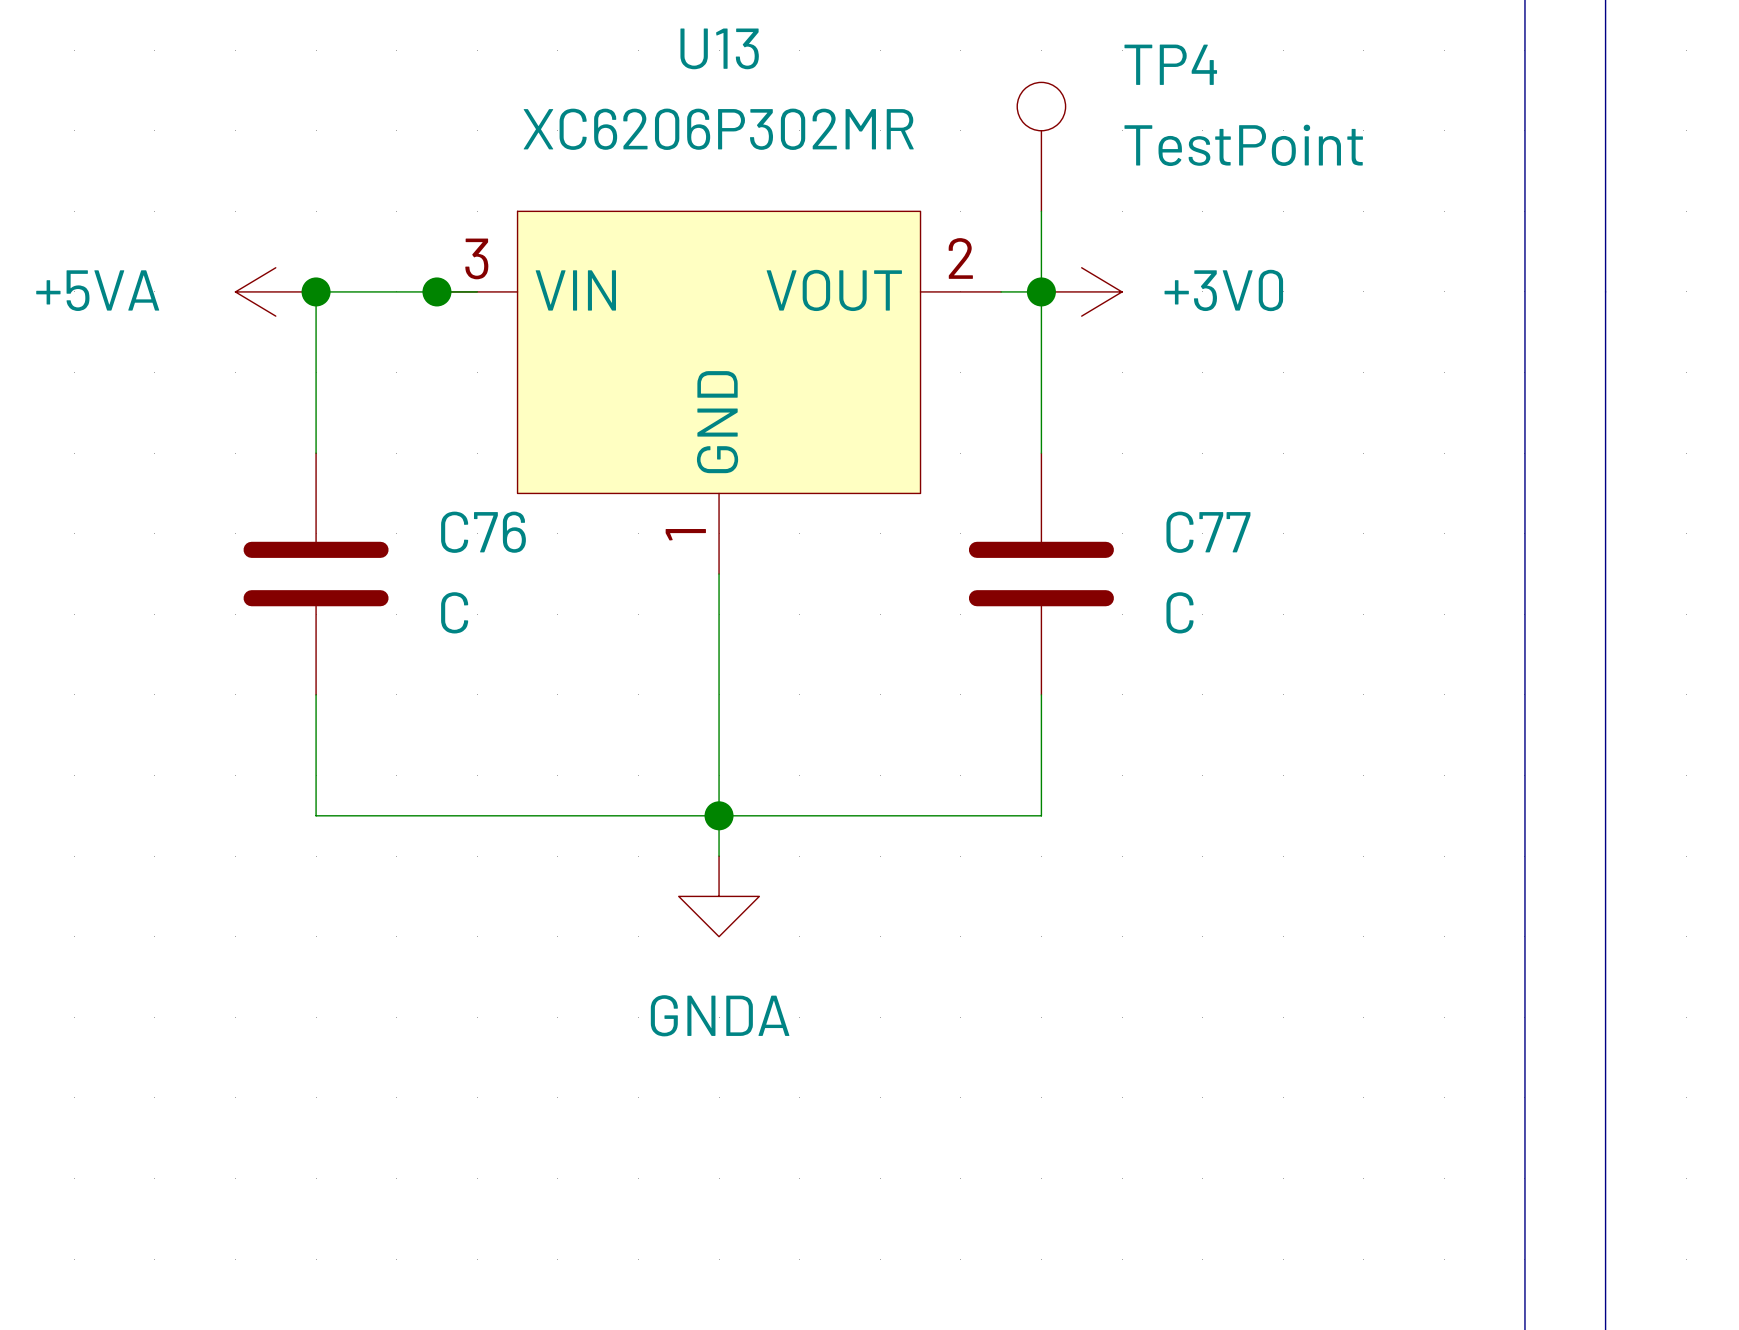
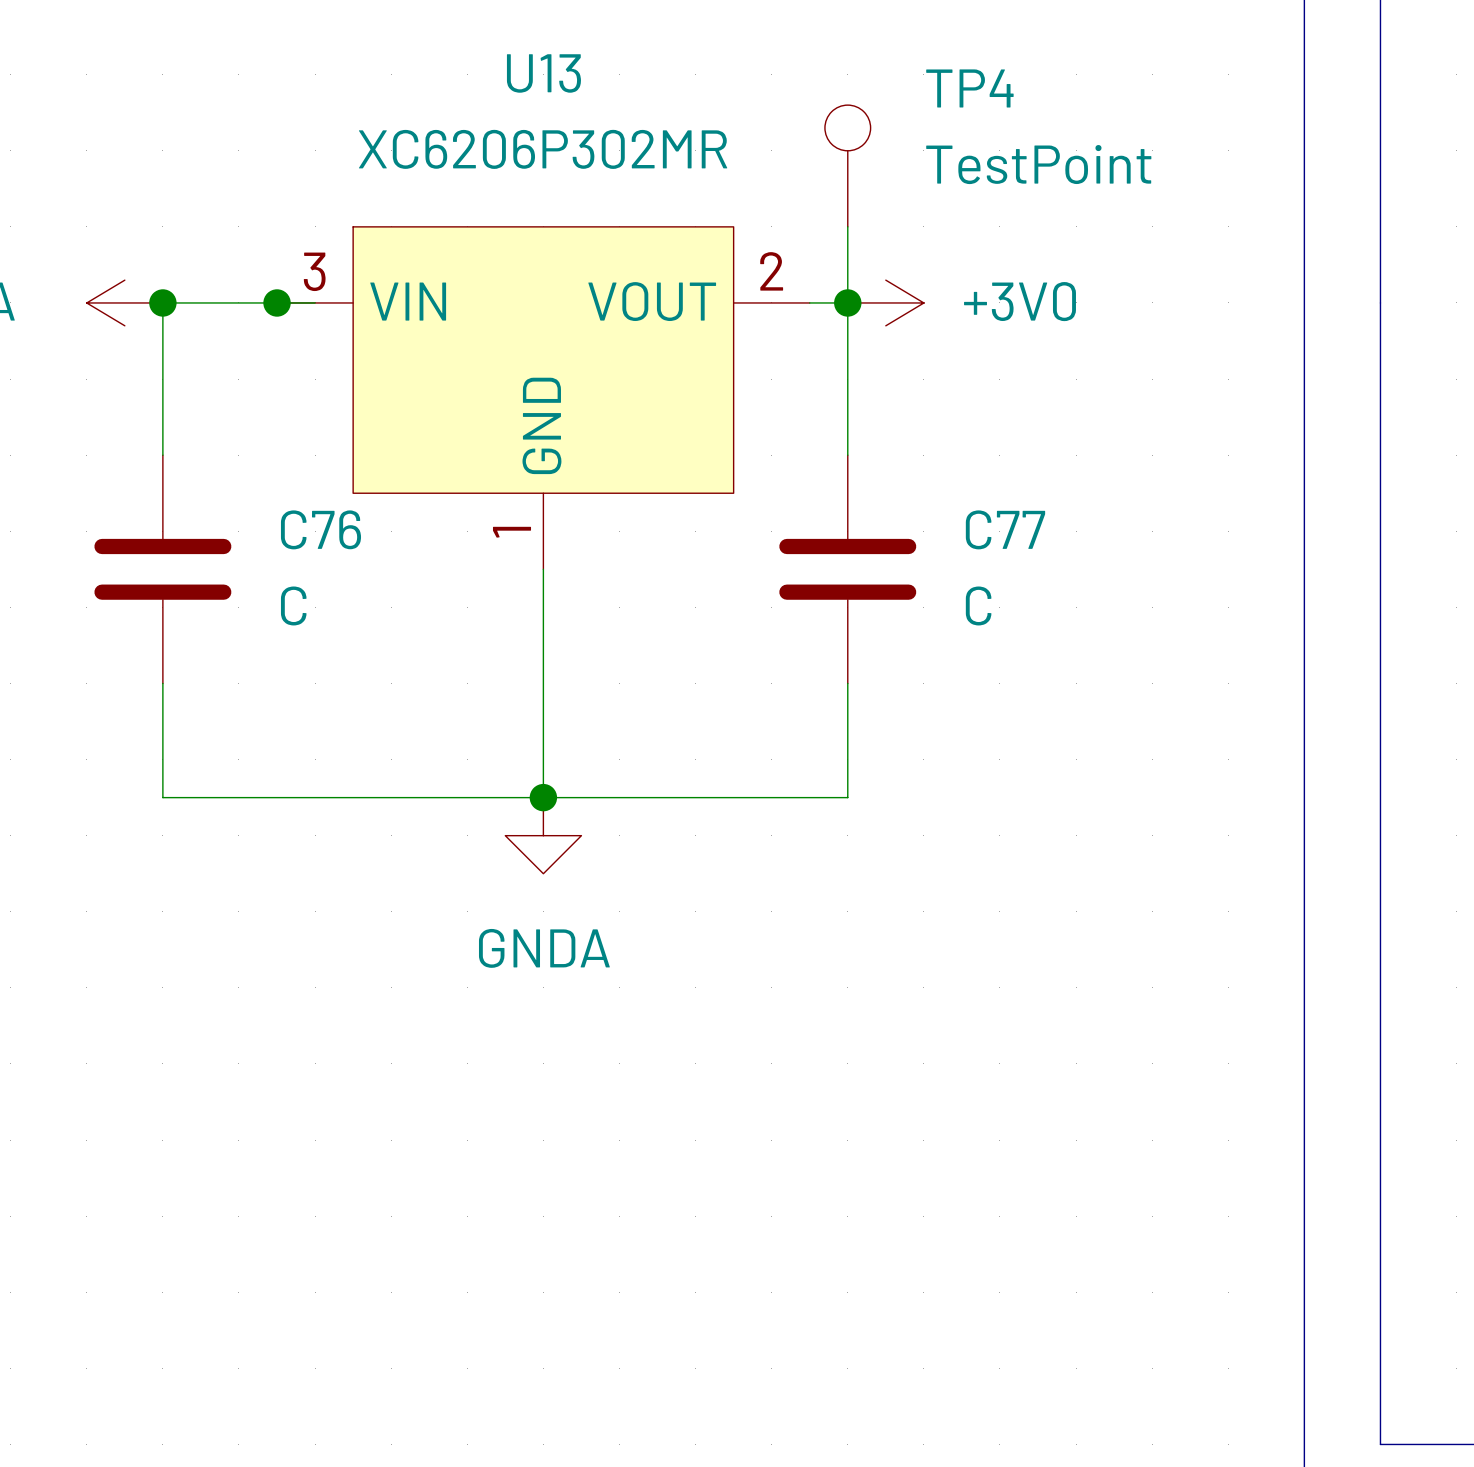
power symbol position: GNDA (719, 896) -> GNDA (543, 835)

